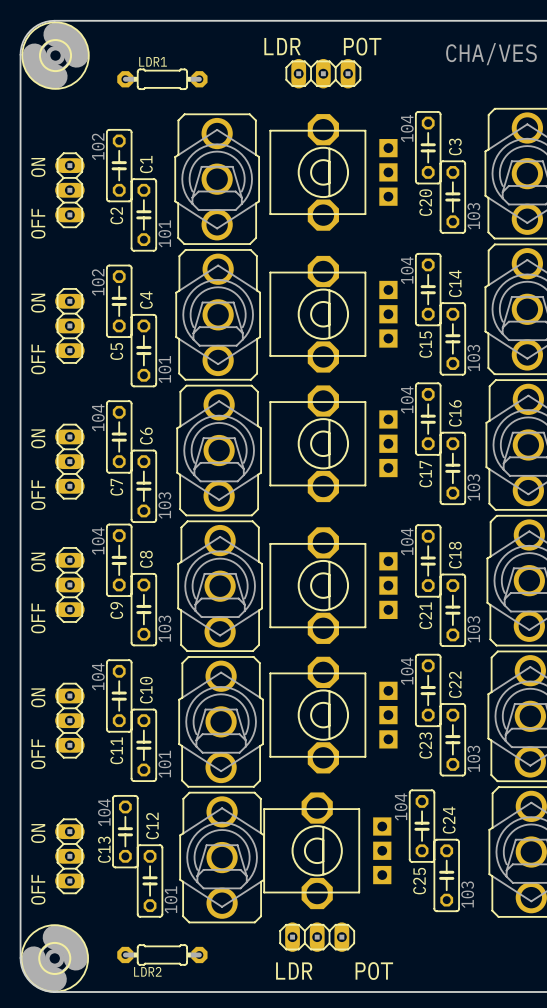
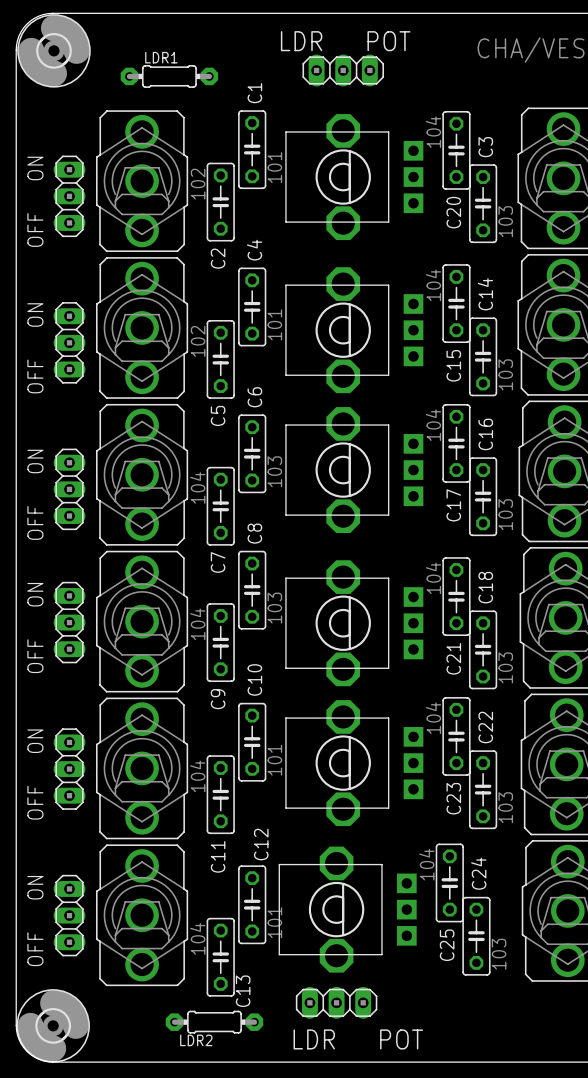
C2 position: (119, 165) -> (220, 202)
part: none -> (142, 181)
part: (217, 179) -> none
C1 position: (143, 214) -> (252, 149)
C5 position: (119, 301) -> (220, 359)
part: none -> (142, 327)
part: (218, 314) -> none
C4 position: (143, 350) -> (252, 306)
C7 position: (119, 436) -> (220, 506)
part: none -> (142, 474)
part: (219, 450) -> none
C6 position: (143, 486) -> (252, 453)
C9 position: (119, 560) -> (220, 642)
part: none -> (142, 621)
part: (220, 586) -> none
C8 position: (143, 609) -> (252, 590)
C11 position: (119, 695) -> (220, 794)
part: none -> (142, 768)
part: (221, 721) -> none
C10 position: (143, 745) -> (252, 742)
C12 name position: C12 (152, 825) -> C12 (261, 844)
C13 position: (125, 831) -> (220, 957)
C13 name position: C13 (104, 849) -> C13 (243, 991)
part: none -> (142, 915)
part: (222, 857) -> none
C12 position: (150, 880) -> (252, 904)
LDR2 position: (162, 954) -> (214, 1022)

